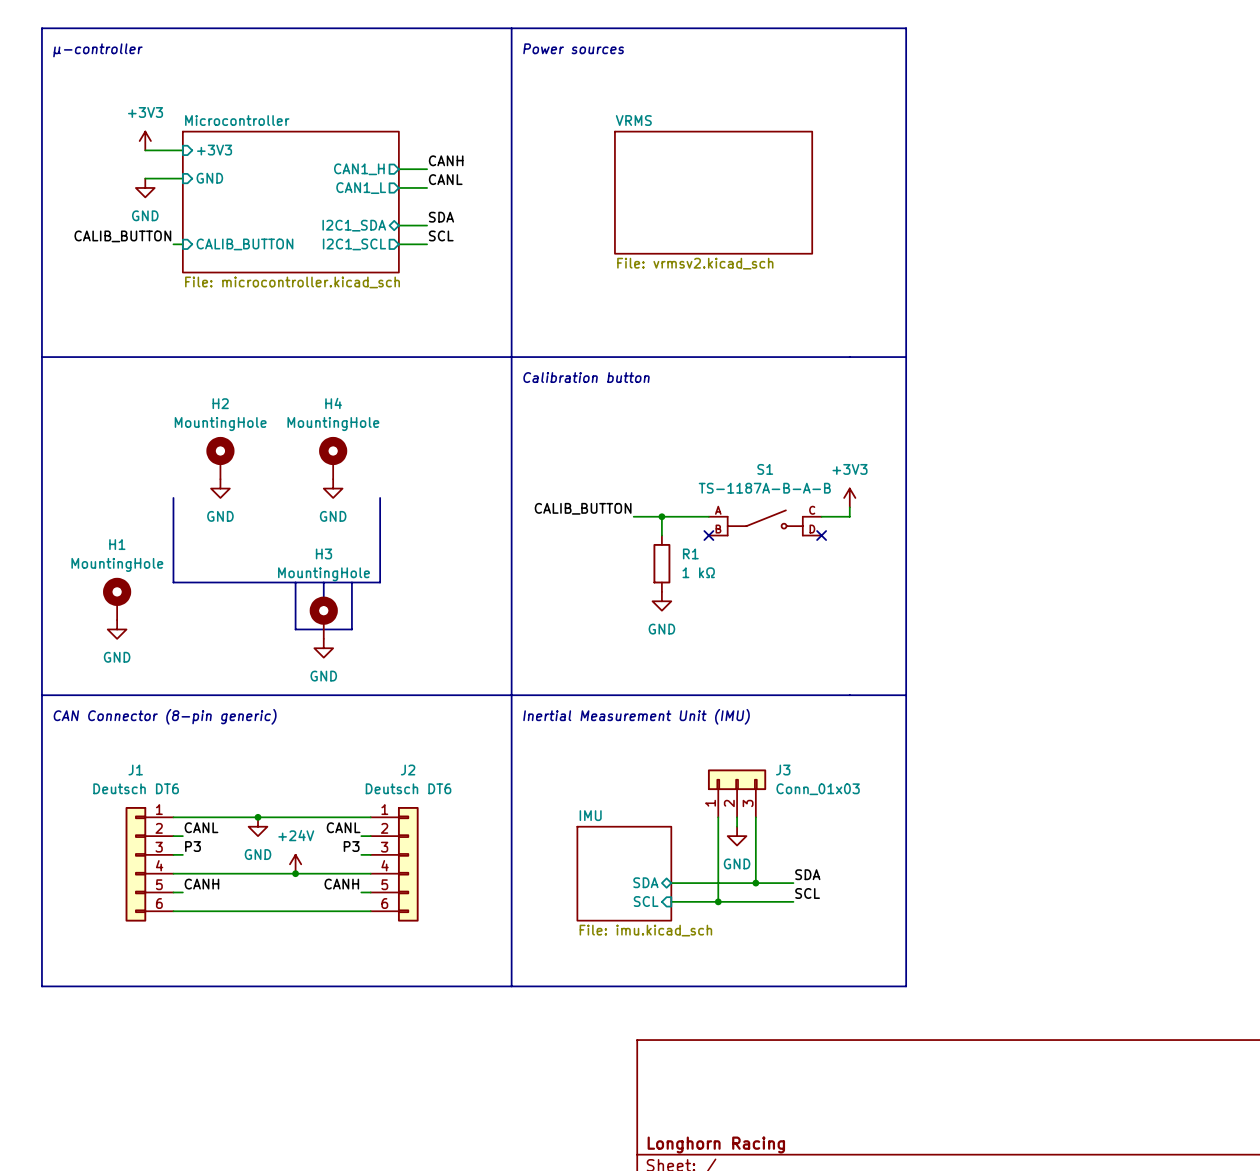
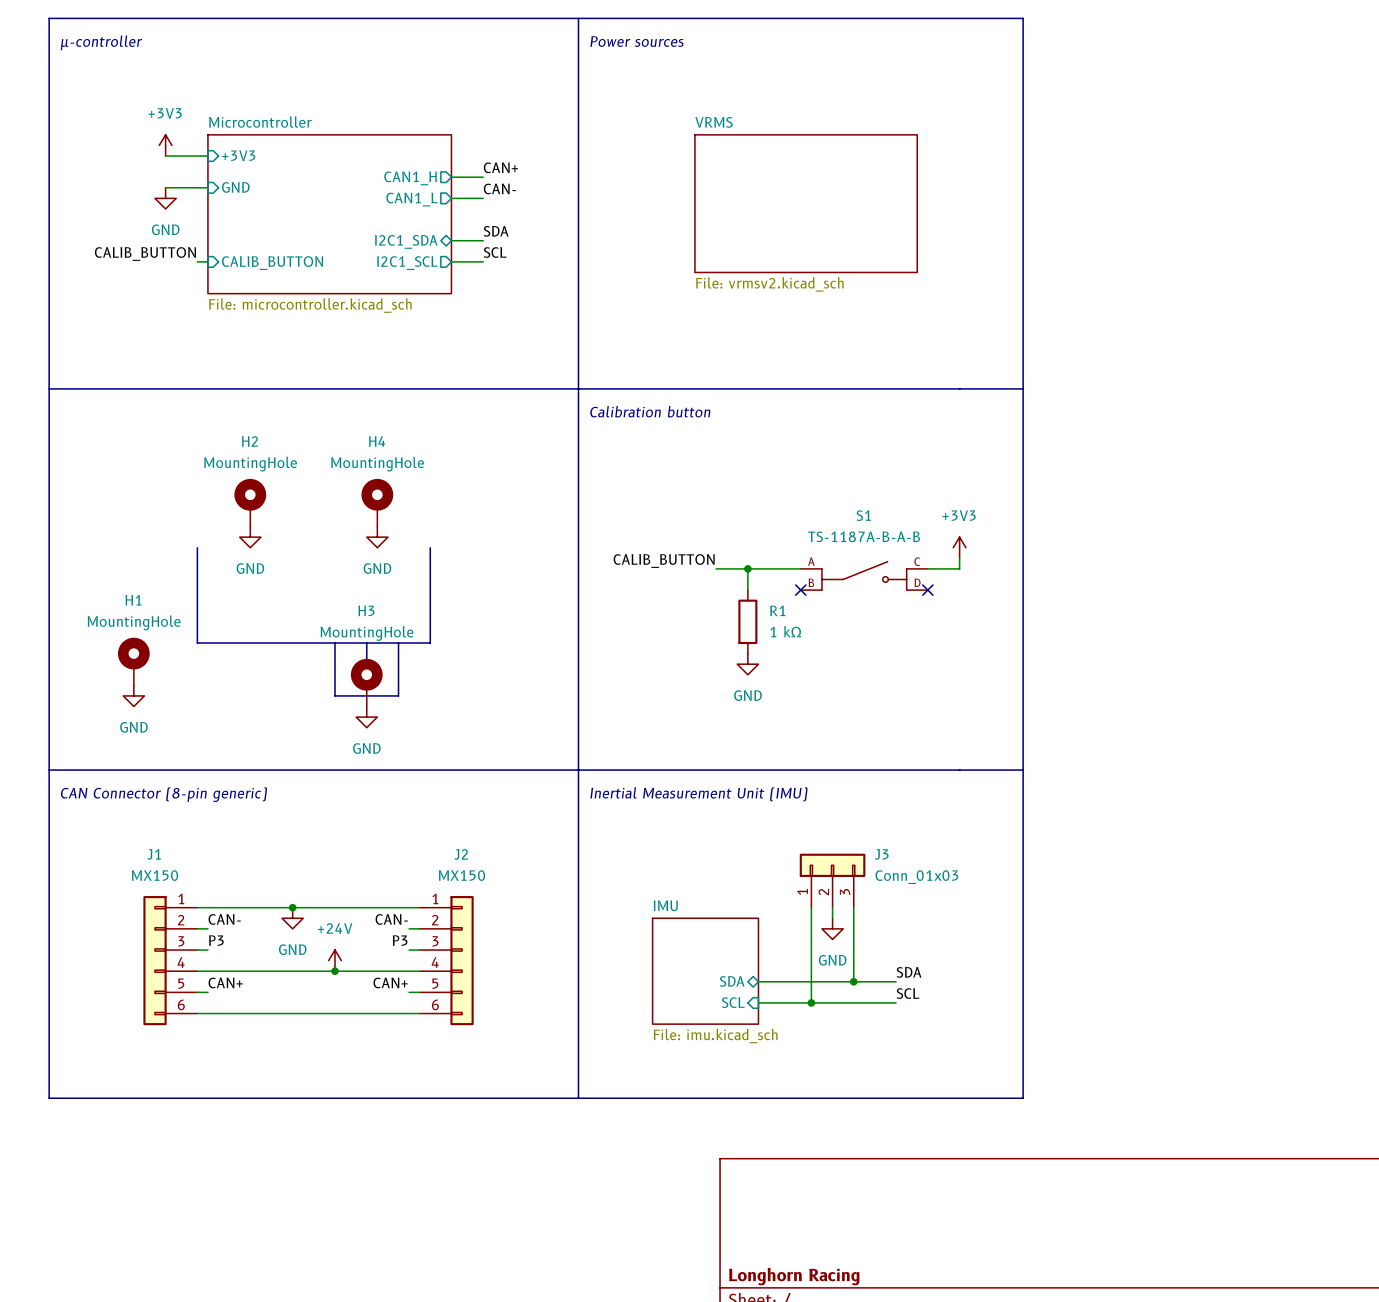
label: CANH (446, 160) -> CAN+ (500, 167)
label: CANL (445, 179) -> CAN- (499, 188)
J1 value: Deutsch DT6 (136, 788) -> MX150 (154, 875)
J2 value: Deutsch DT6 (408, 788) -> MX150 (461, 875)
label: CANL (201, 827) -> CAN- (224, 919)
label: CANL (343, 827) -> CAN- (391, 919)
label: CANH (201, 884) -> CAN+ (225, 982)
label: CANH (341, 884) -> CAN+ (390, 982)

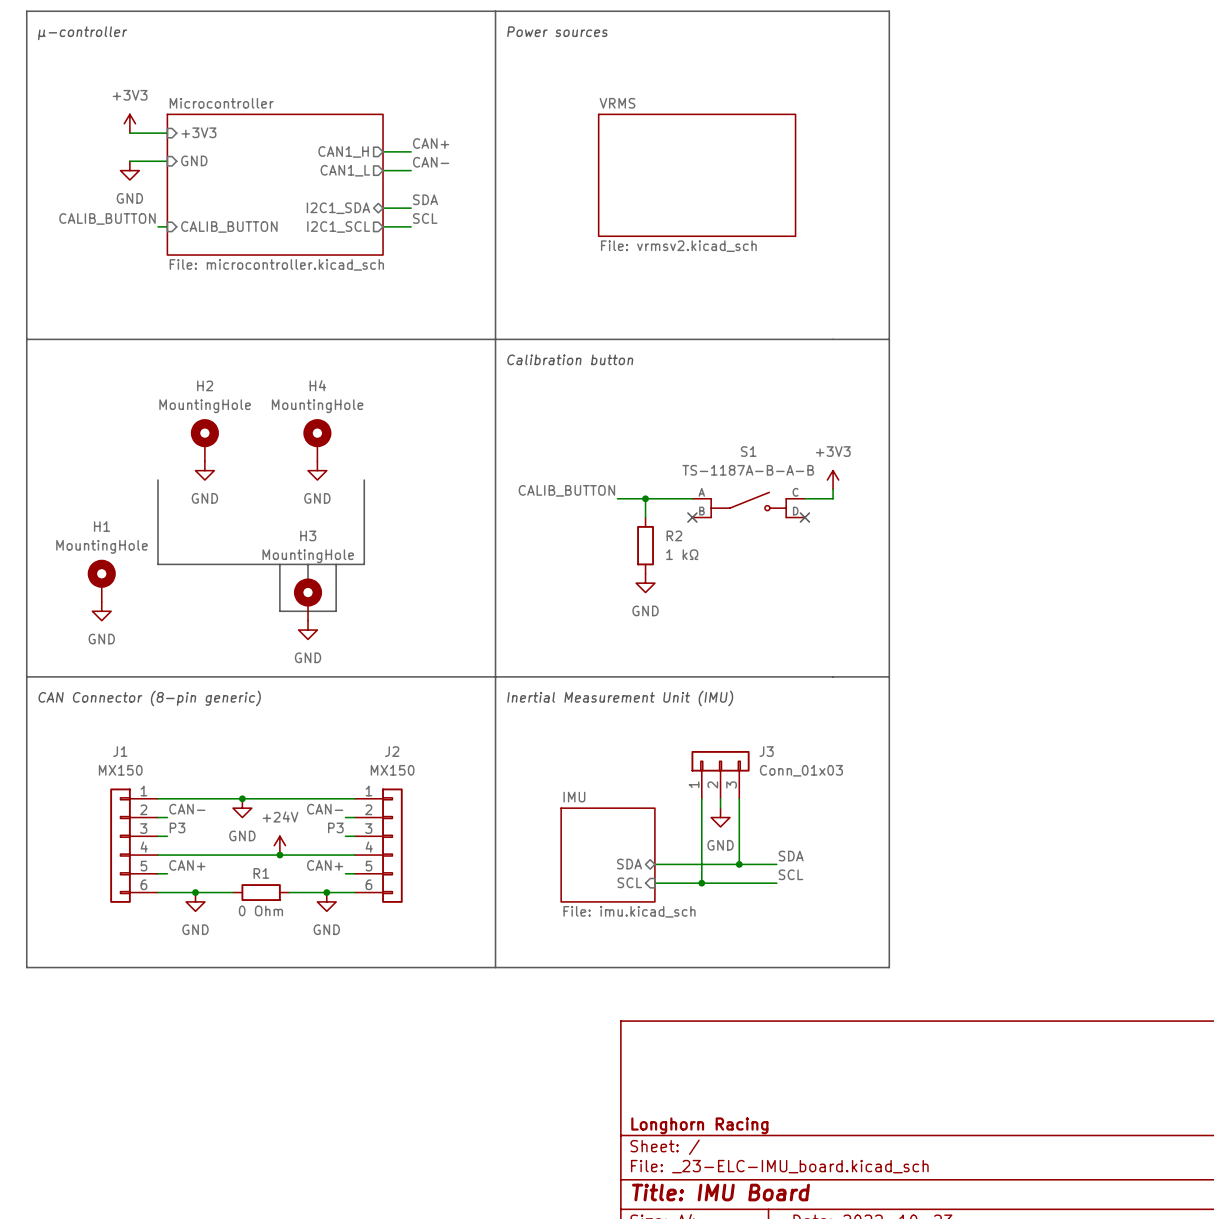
R1 name: R1 (777, 610) -> R2 (674, 535)
junction: none -> (195, 892)
wire: (282, 1013) (345, 1013) -> none
R1: none -> 0 Ohm (261, 892)
junction: none -> (326, 892)
power symbol: none -> GND (195, 901)
power symbol: none -> GND (326, 901)

